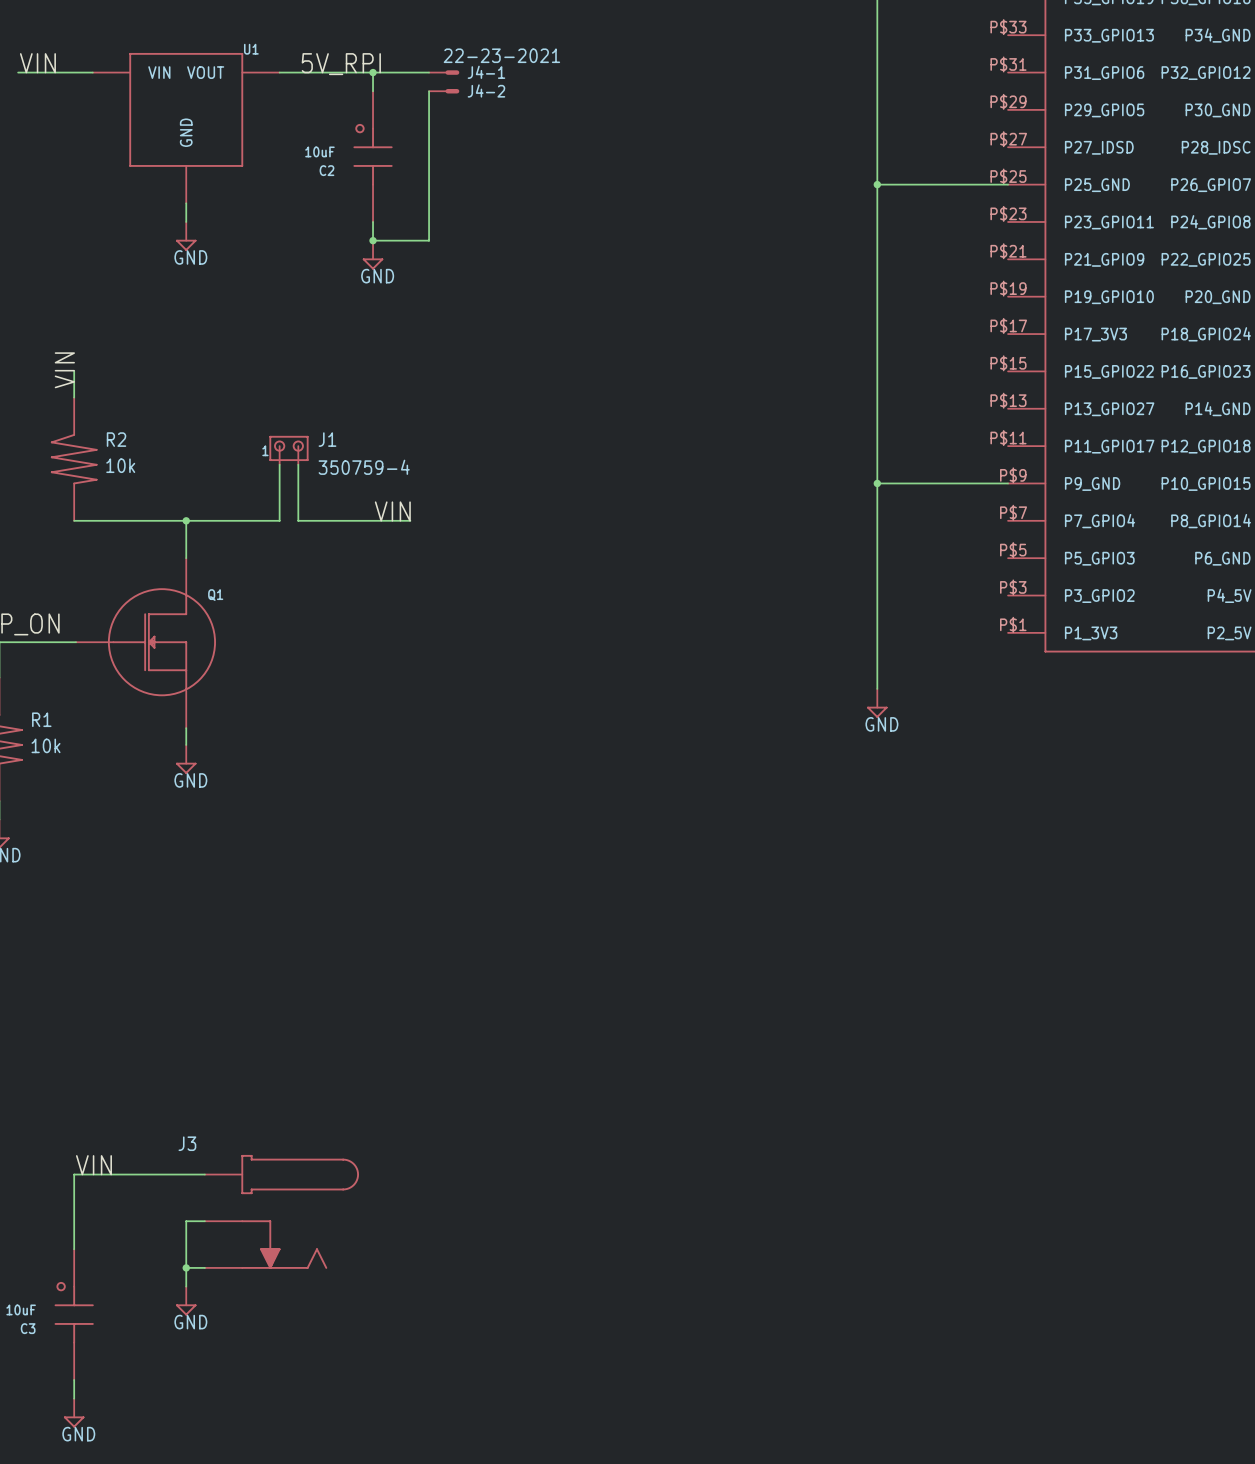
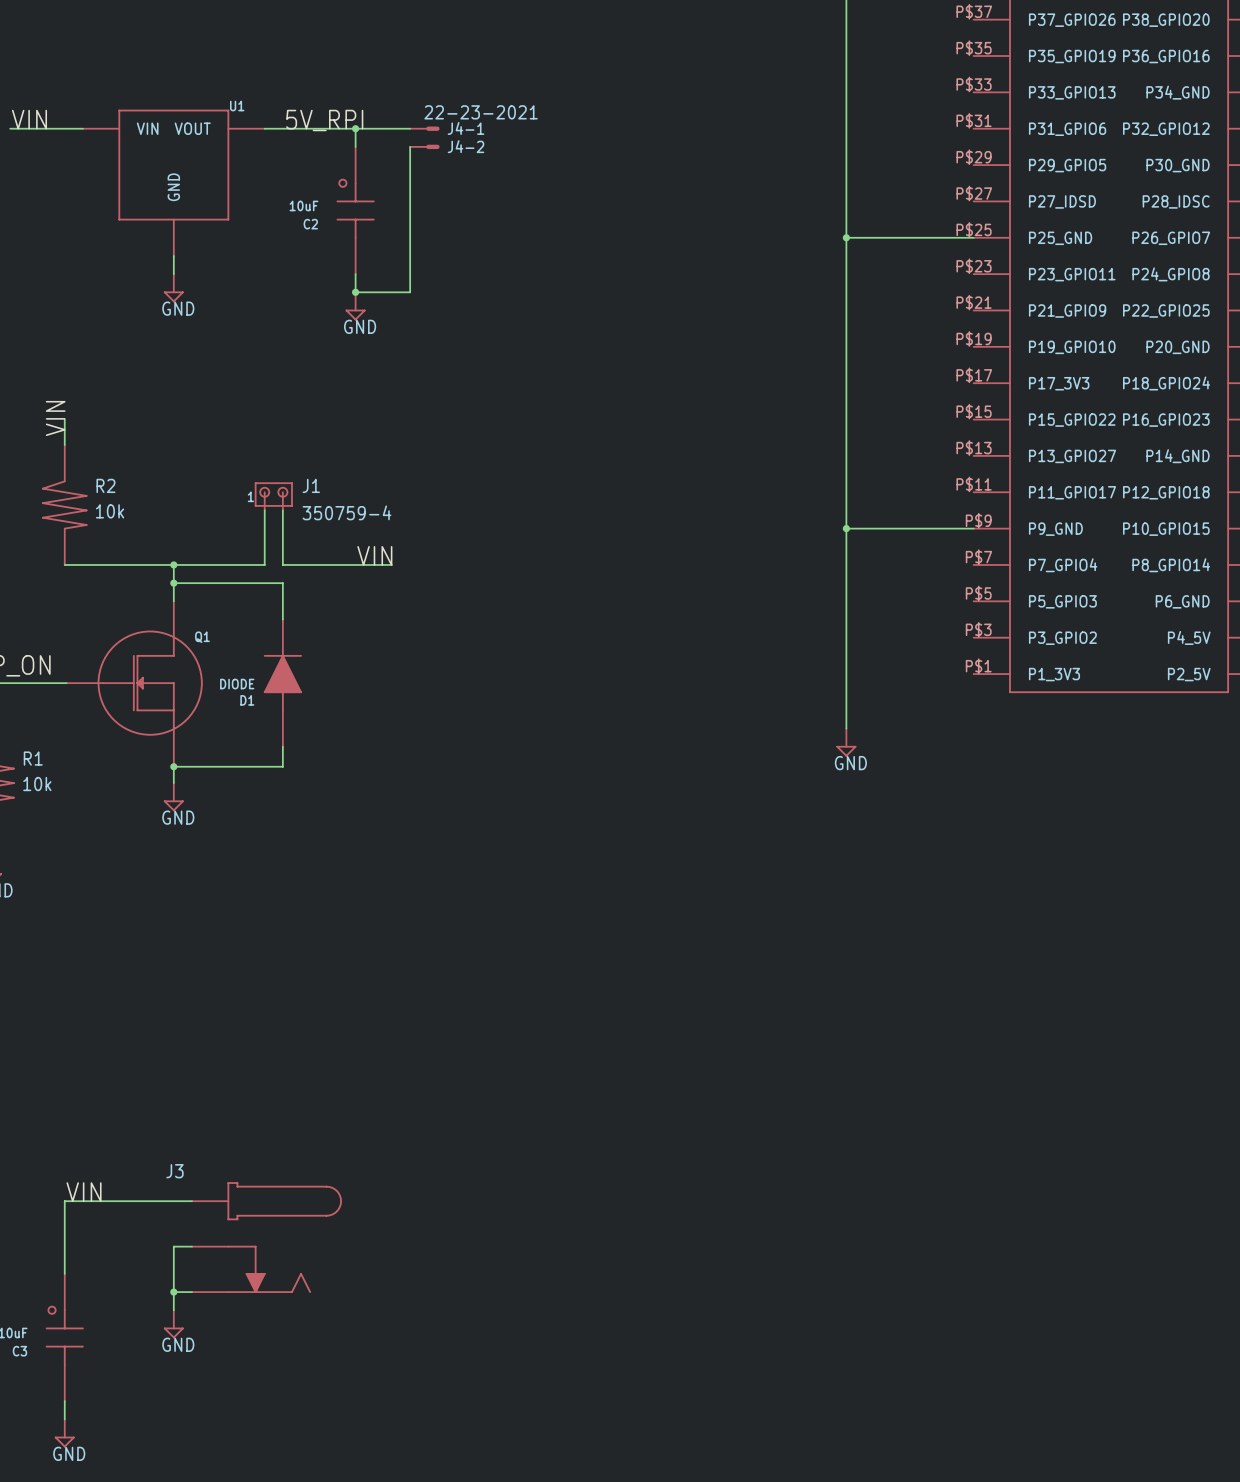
wire: none -> (173, 583) (282, 583) (282, 619)
junction: none -> (173, 583)
D1: none -> DIODE (282, 683)
wire: none -> (282, 746) (282, 766) (173, 766)
junction: none -> (173, 766)

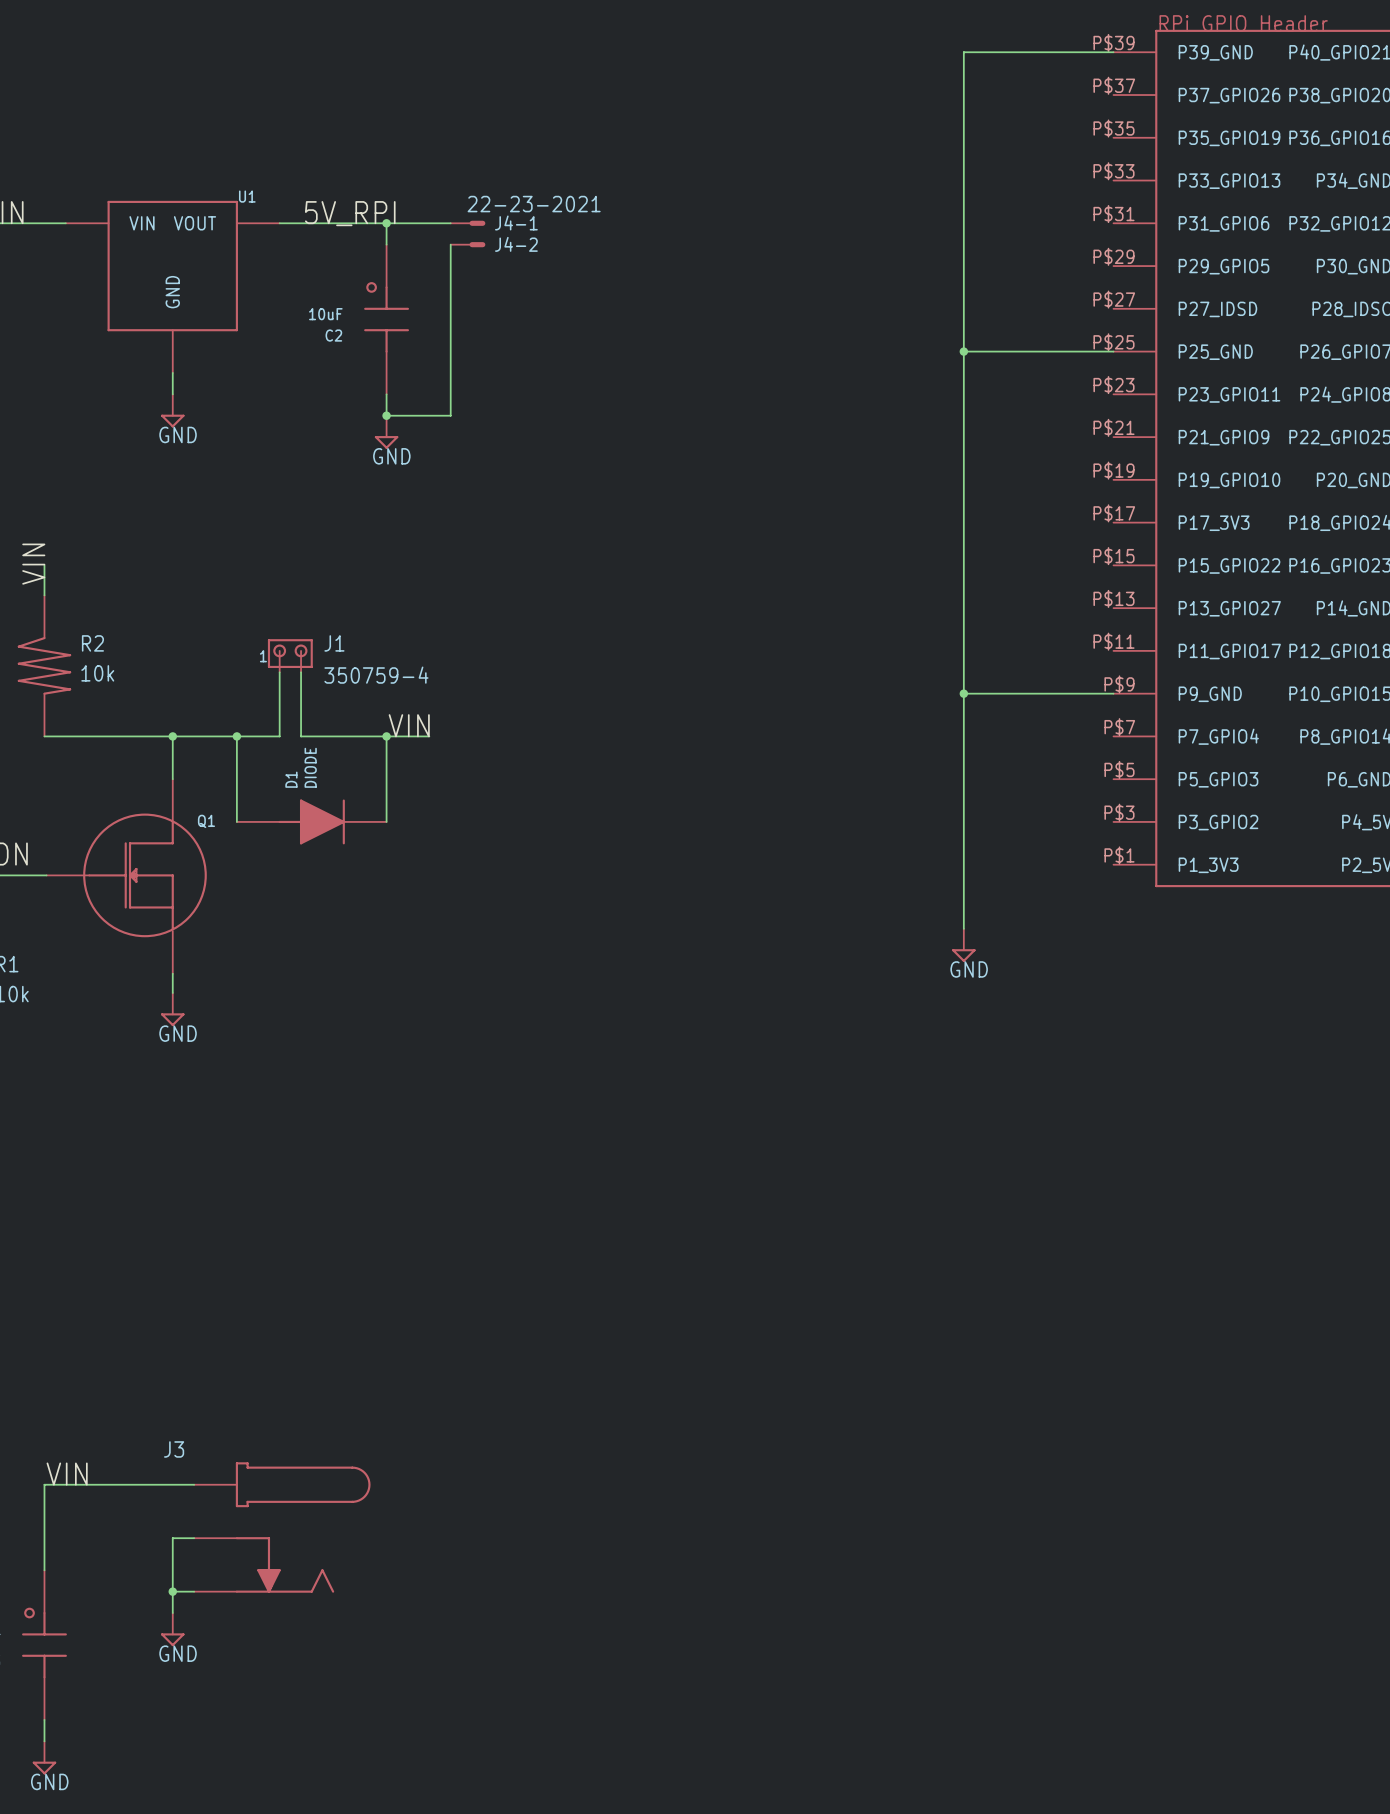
wire: none -> (236, 736) (236, 821)
junction: none -> (236, 736)
wire: none -> (386, 736) (386, 821)
junction: none -> (386, 736)
wire: (173, 583) (282, 583) (282, 619) -> none
junction: (173, 583) -> none
D1 rotation: 0° (282, 683) -> 90° clockwise (311, 821)
wire: (282, 746) (282, 766) (173, 766) -> none
junction: (173, 766) -> none

